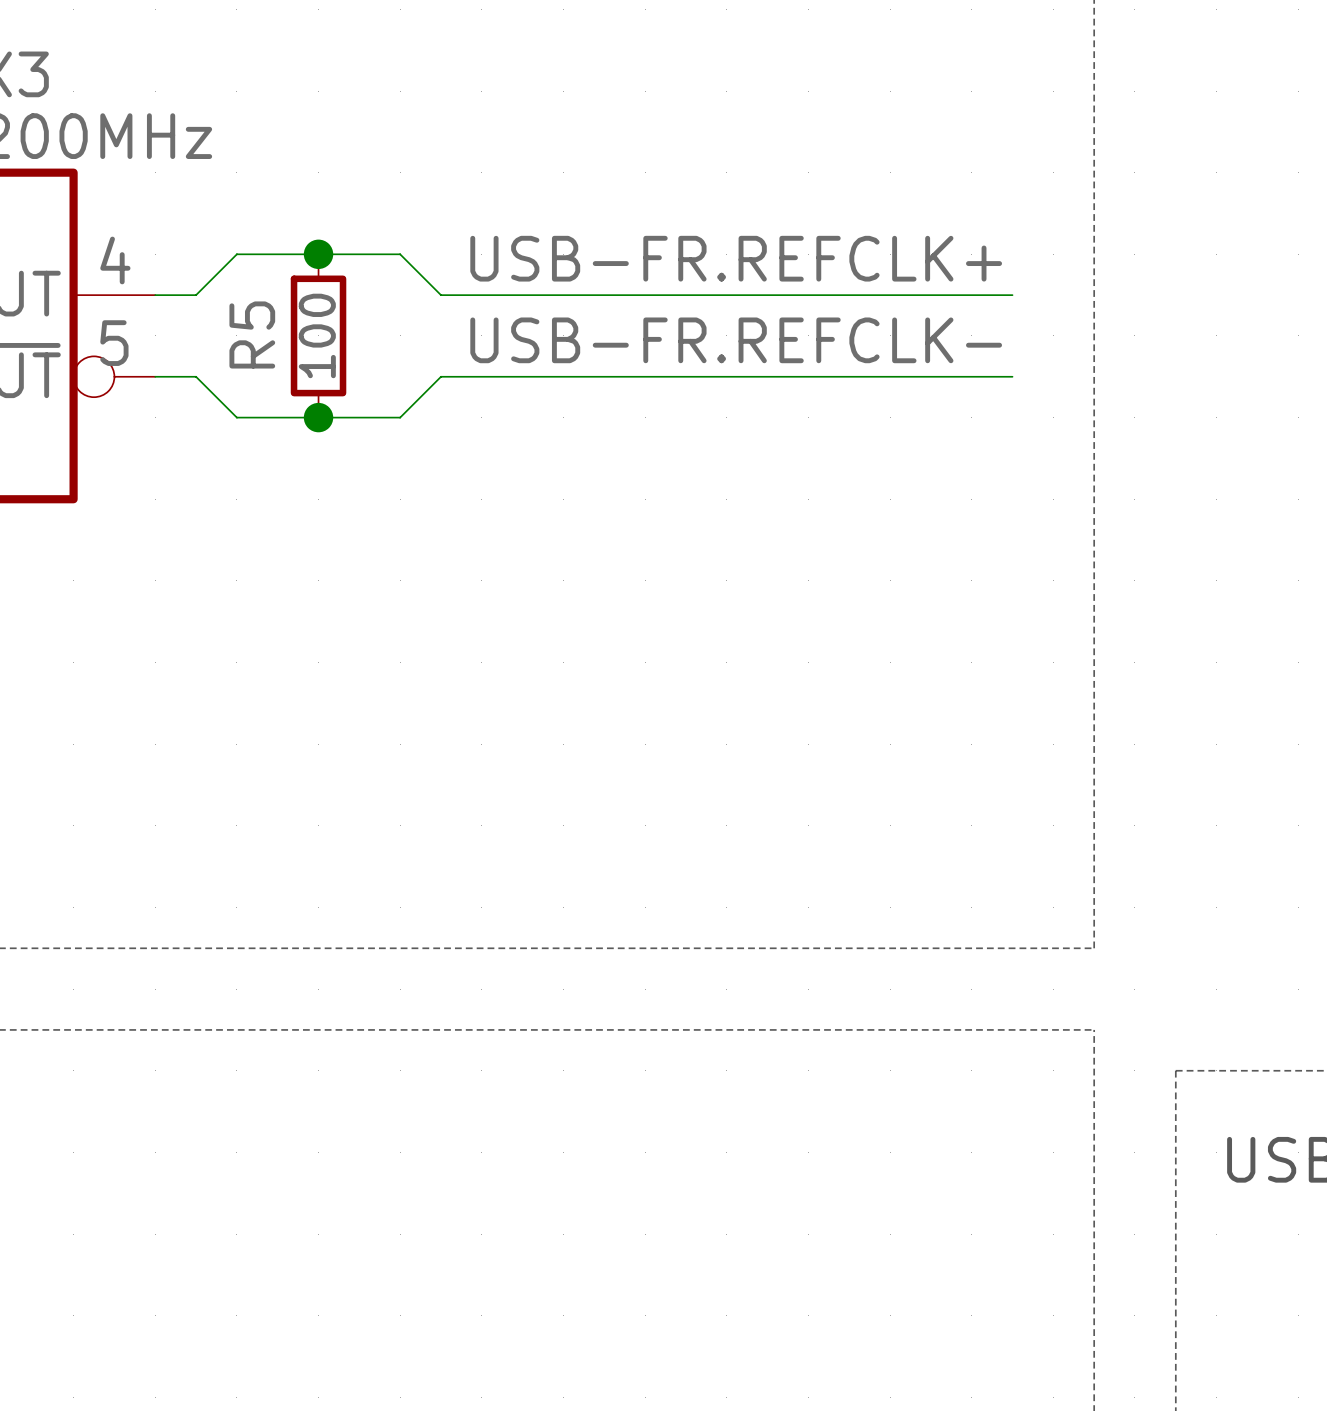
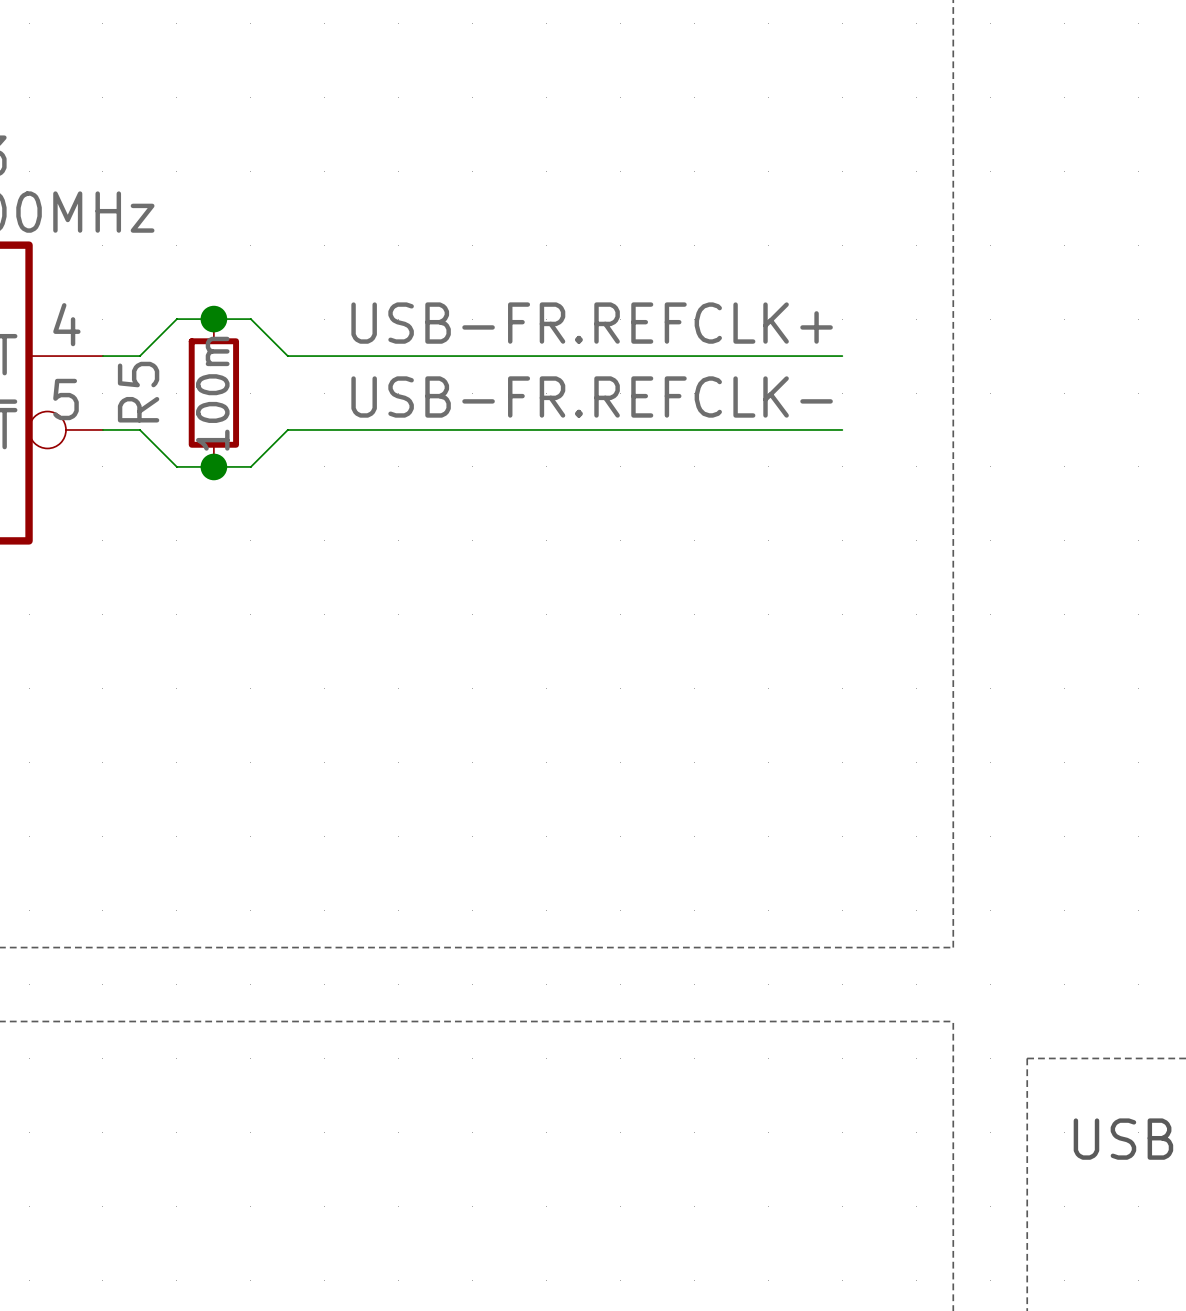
wire: (318, 254) (400, 254) (440, 295) -> (250, 319) (287, 356) (361, 356)
junction position: (318, 254) -> (213, 319)
label position: USB-FR.REFCLK+ (736, 258) -> USB-FR.REFCLK+ (592, 323)
wire: (971, 295) (1012, 295) -> none
R5 name position: R5 (252, 334) -> R5 (138, 392)
R5 value: 100 (317, 335) -> 100m (212, 393)
R5 position: (318, 335) -> (213, 393)
label position: USB-FR.REFCLK- (736, 340) -> USB-FR.REFCLK- (592, 397)
wire: (440, 376) (400, 417) (318, 417) -> (361, 429) (287, 429) (250, 466)
wire: (971, 376) (1012, 376) -> none
junction position: (318, 417) -> (213, 466)

